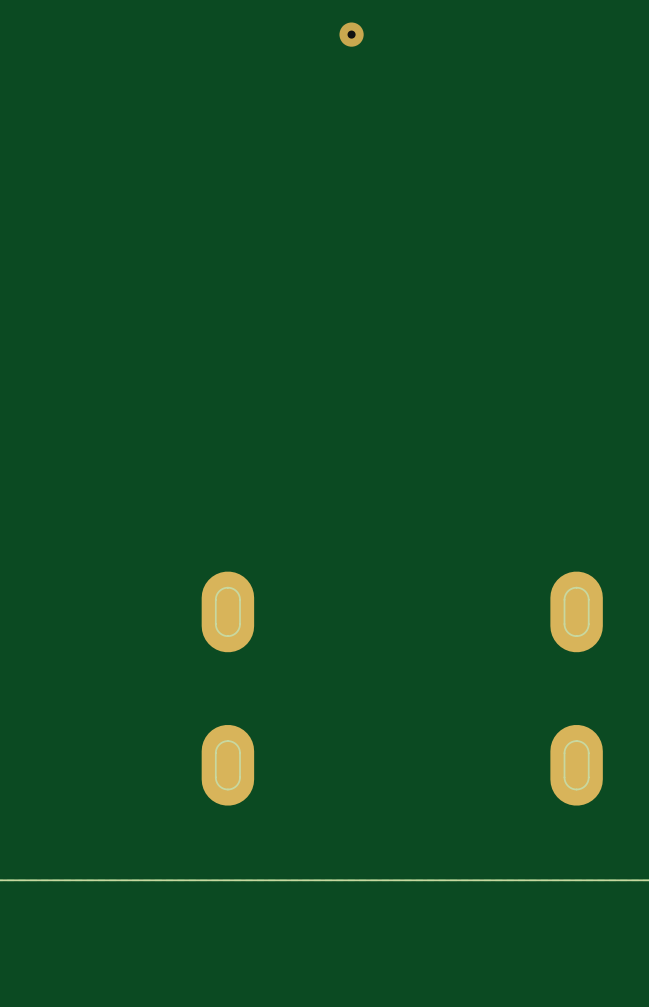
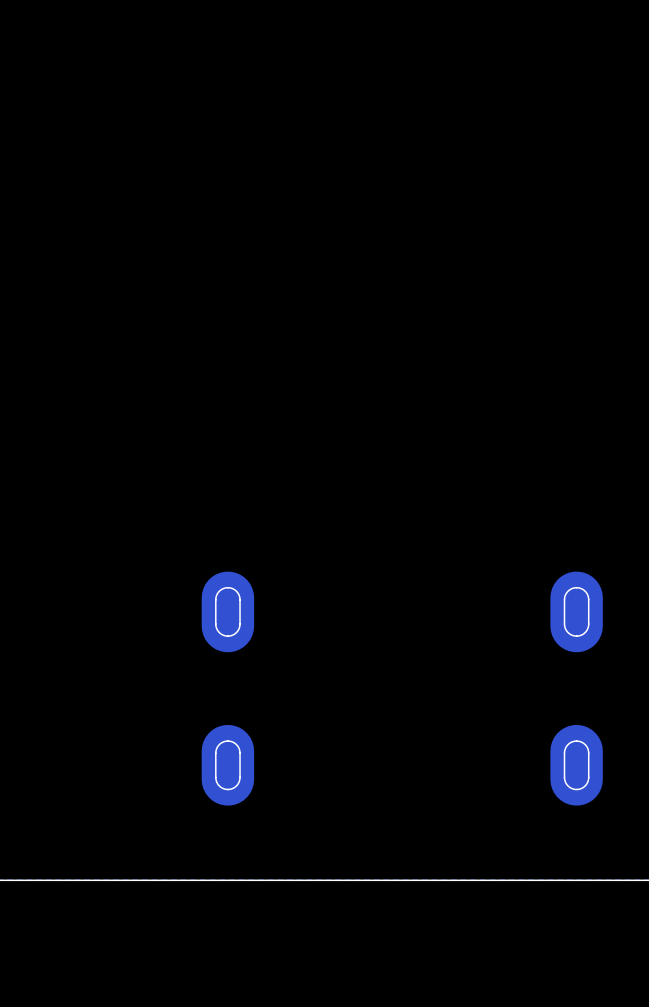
via: (351, 34) -> none

